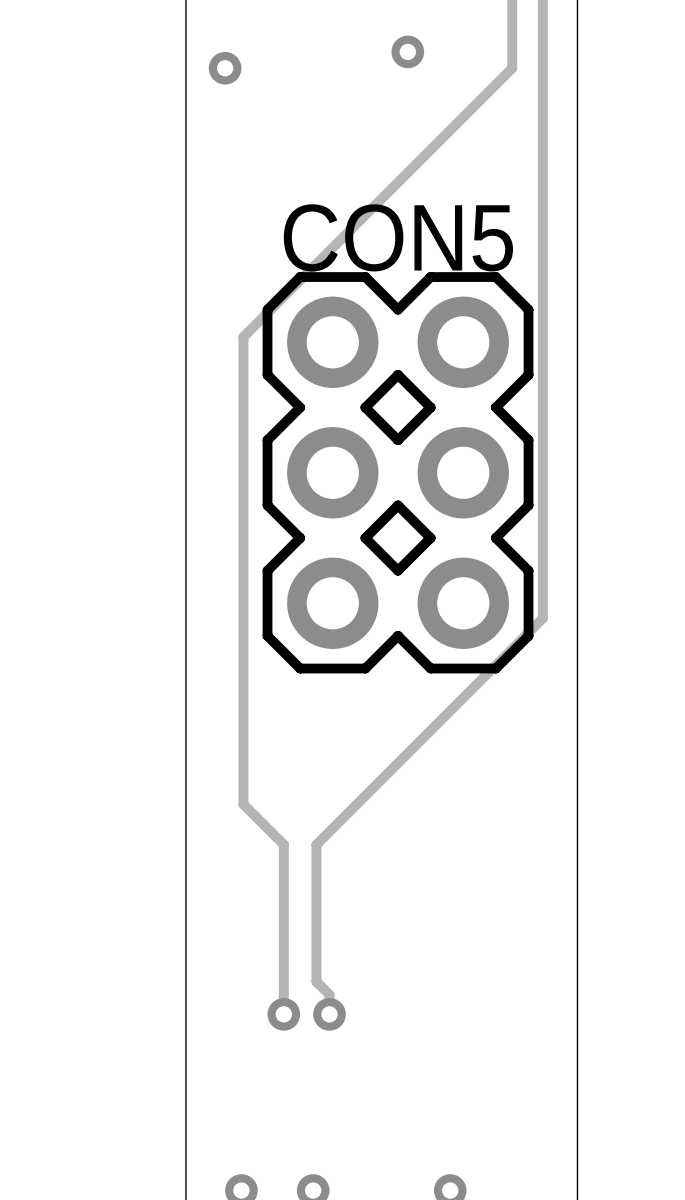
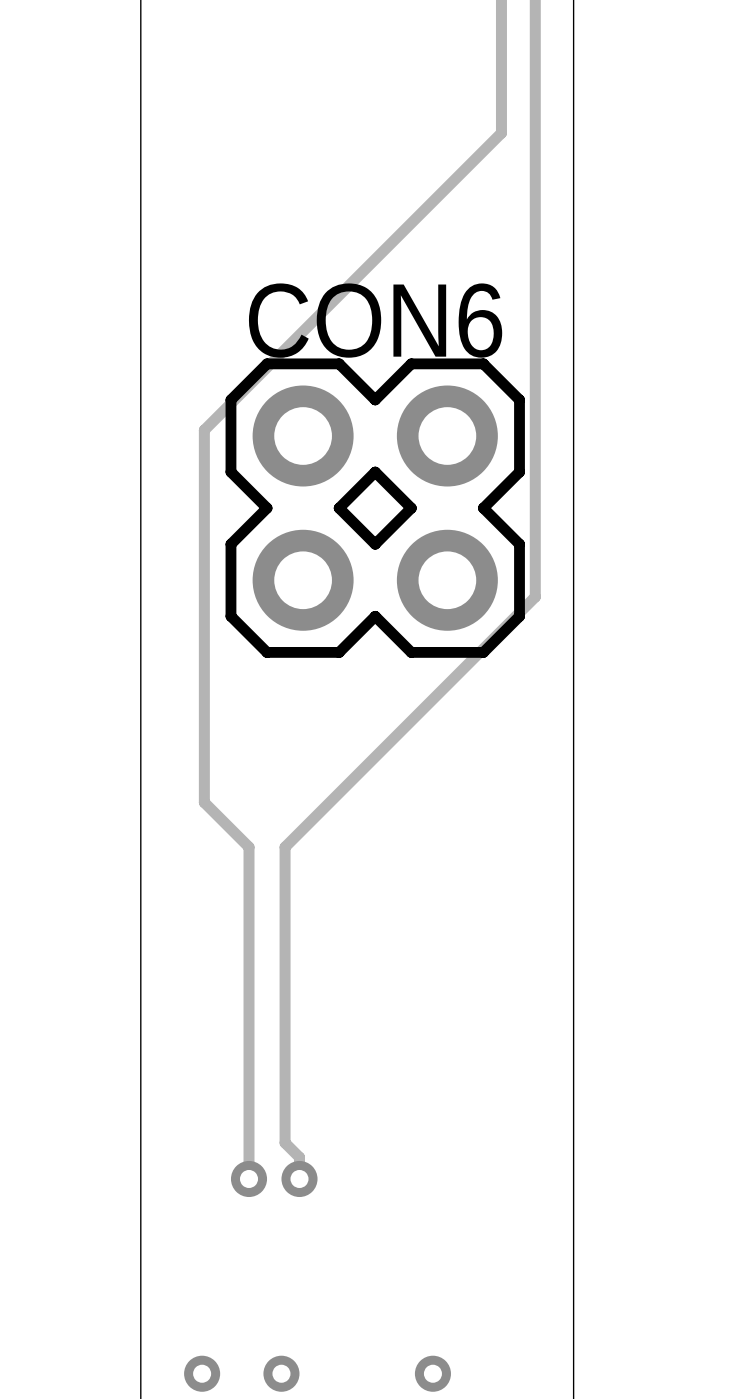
via: (407, 51) -> none
via: (225, 68) -> none
CON6: none -> (375, 508)
CON5: (398, 472) -> none
track: (542, 487) (542, 618) (316, 844) -> (535, 596) (285, 847) (285, 991)
track: (243, 673) (243, 804) (283, 844) -> (204, 802) (249, 847) (249, 991)

